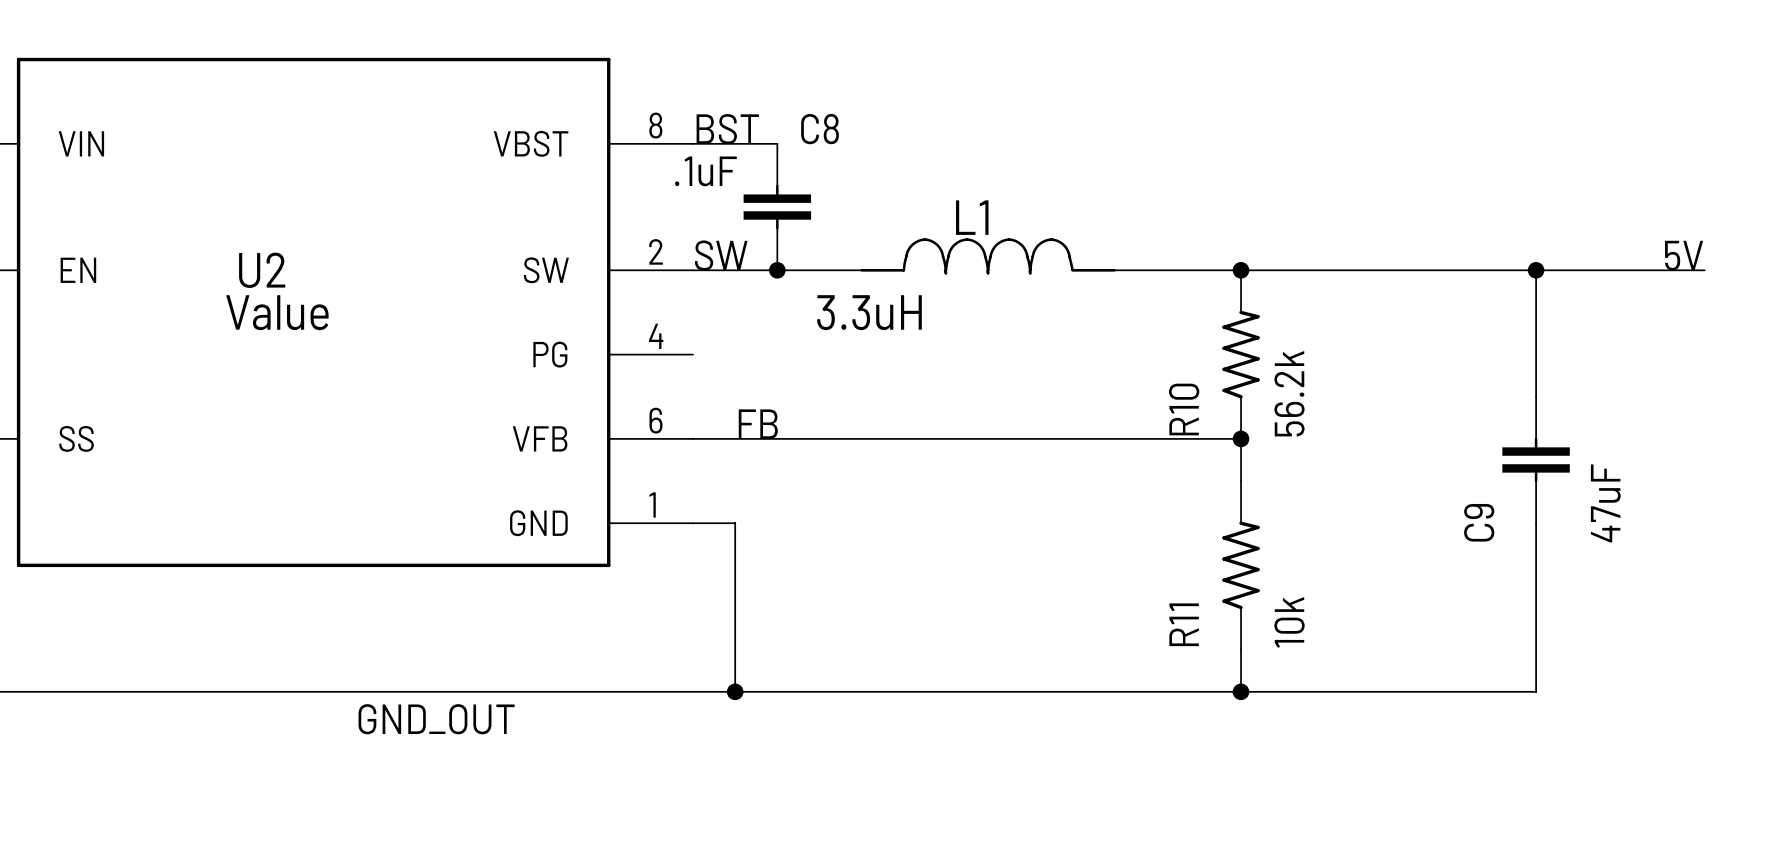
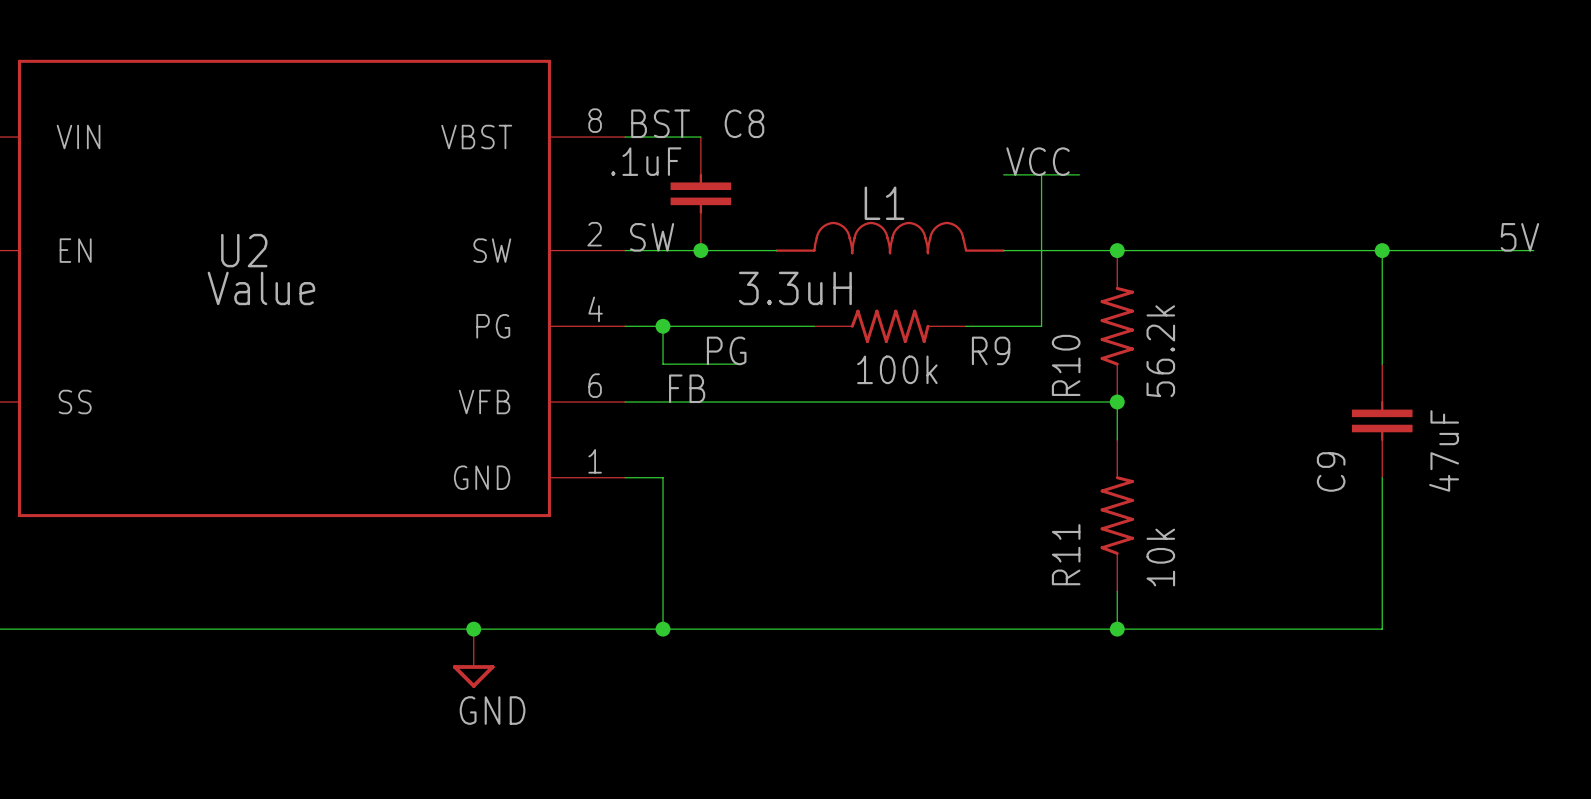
label: none -> VCC (1038, 161)
wire: none -> (1003, 174) (1079, 174)
wire: none -> (1041, 174) (1041, 326) (965, 326)
wire: none -> (625, 326) (814, 326)
wire: none -> (663, 326) (663, 364) (738, 364)
junction: none -> (663, 326)
R9: none -> 100k (890, 326)
label: none -> PG (726, 350)
junction: none -> (473, 629)
label: GND_OUT (436, 719) -> none
power symbol: none -> GND (473, 658)

